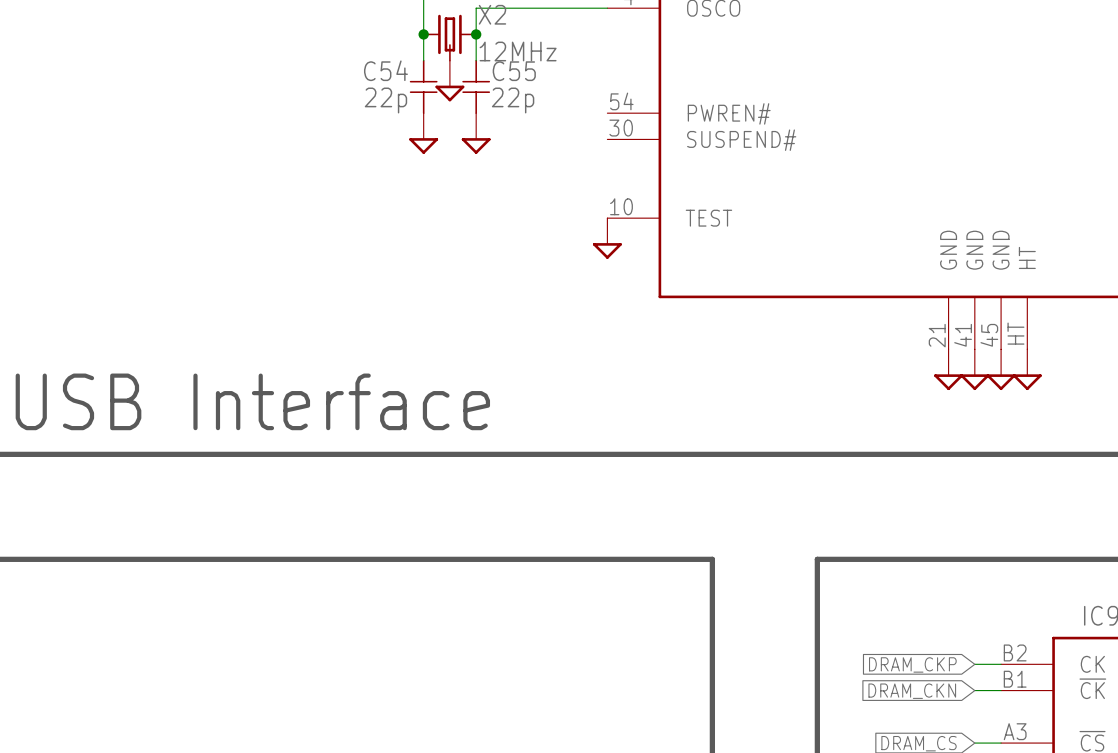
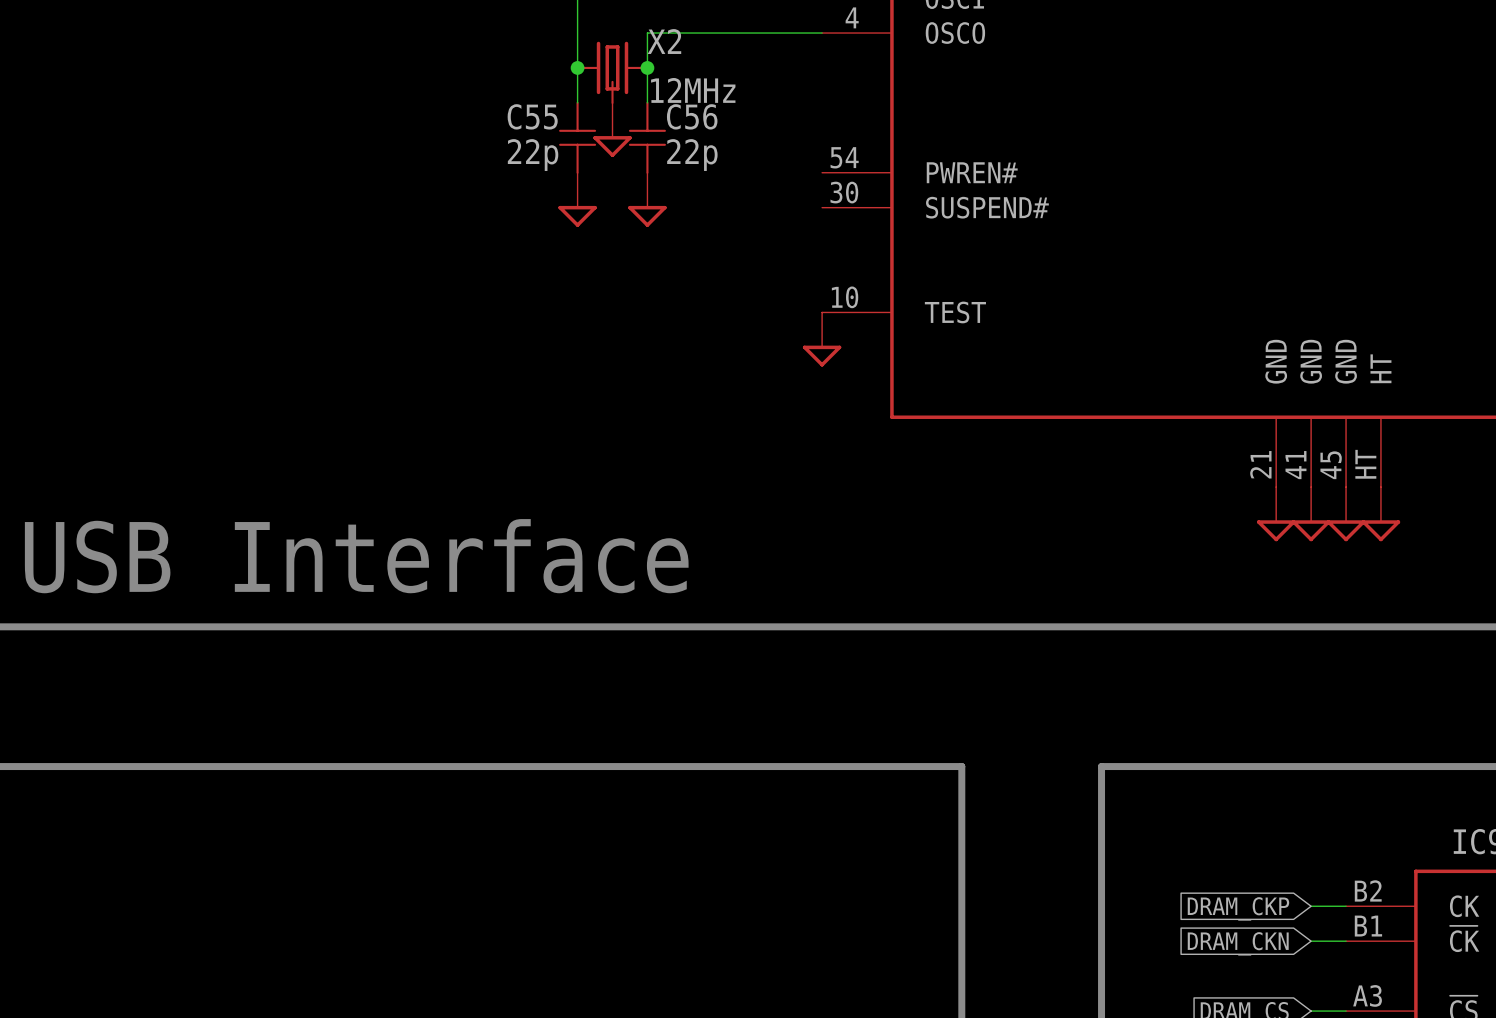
C54 name: C54 (385, 70) -> C55 (532, 116)
C55 name: C55 (514, 71) -> C56 (692, 116)

